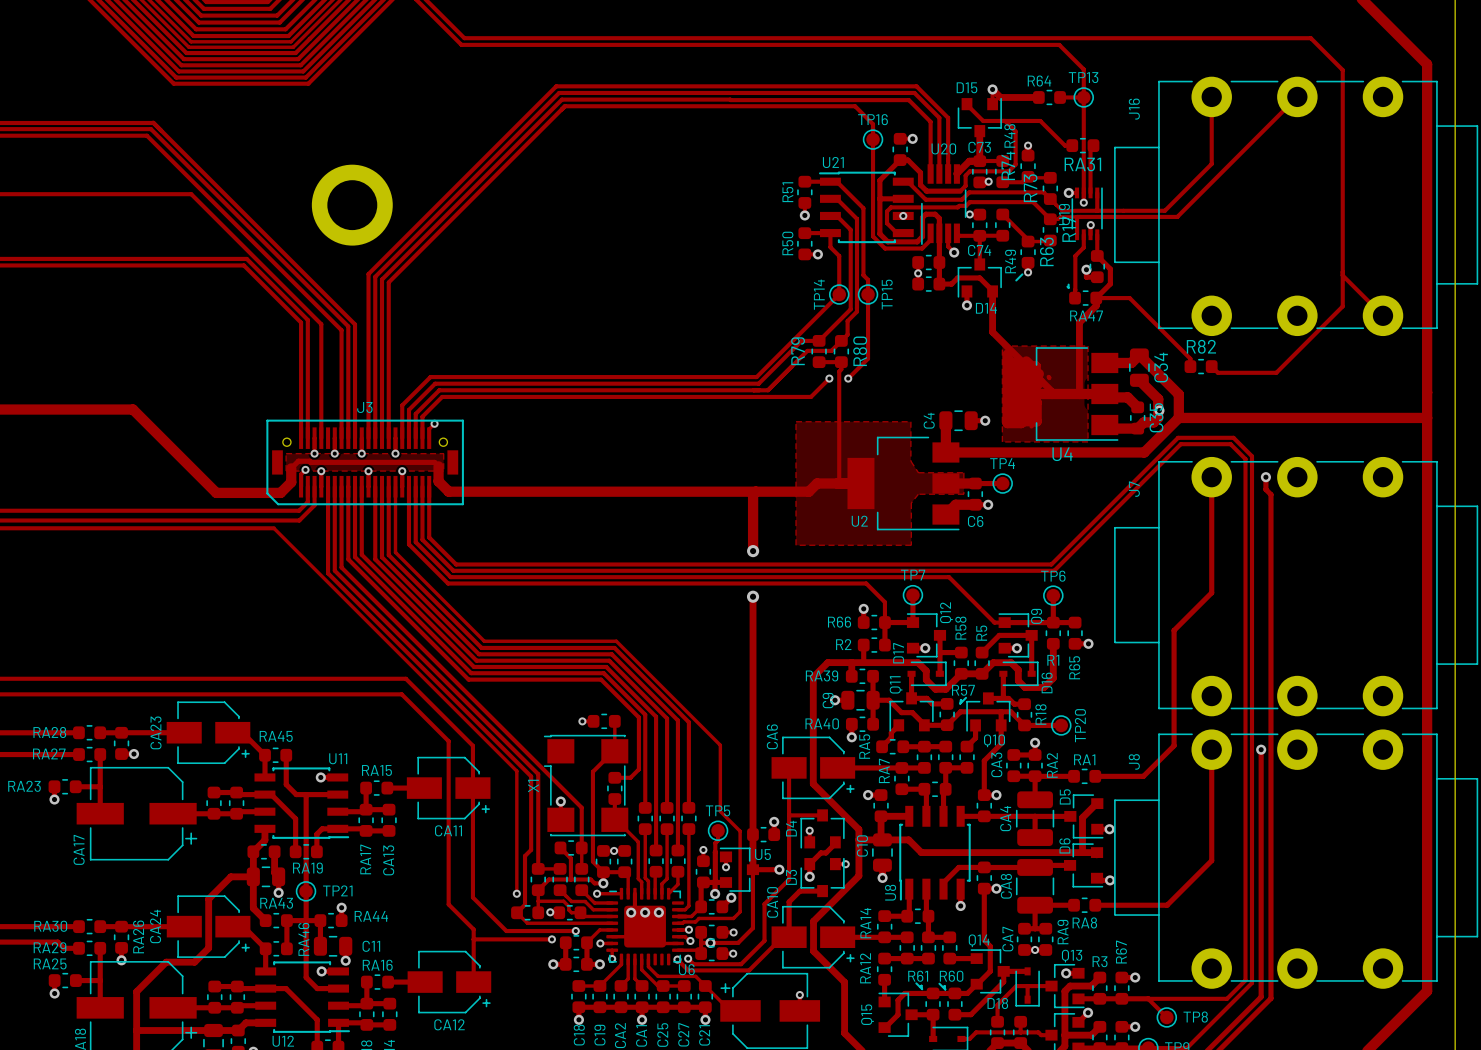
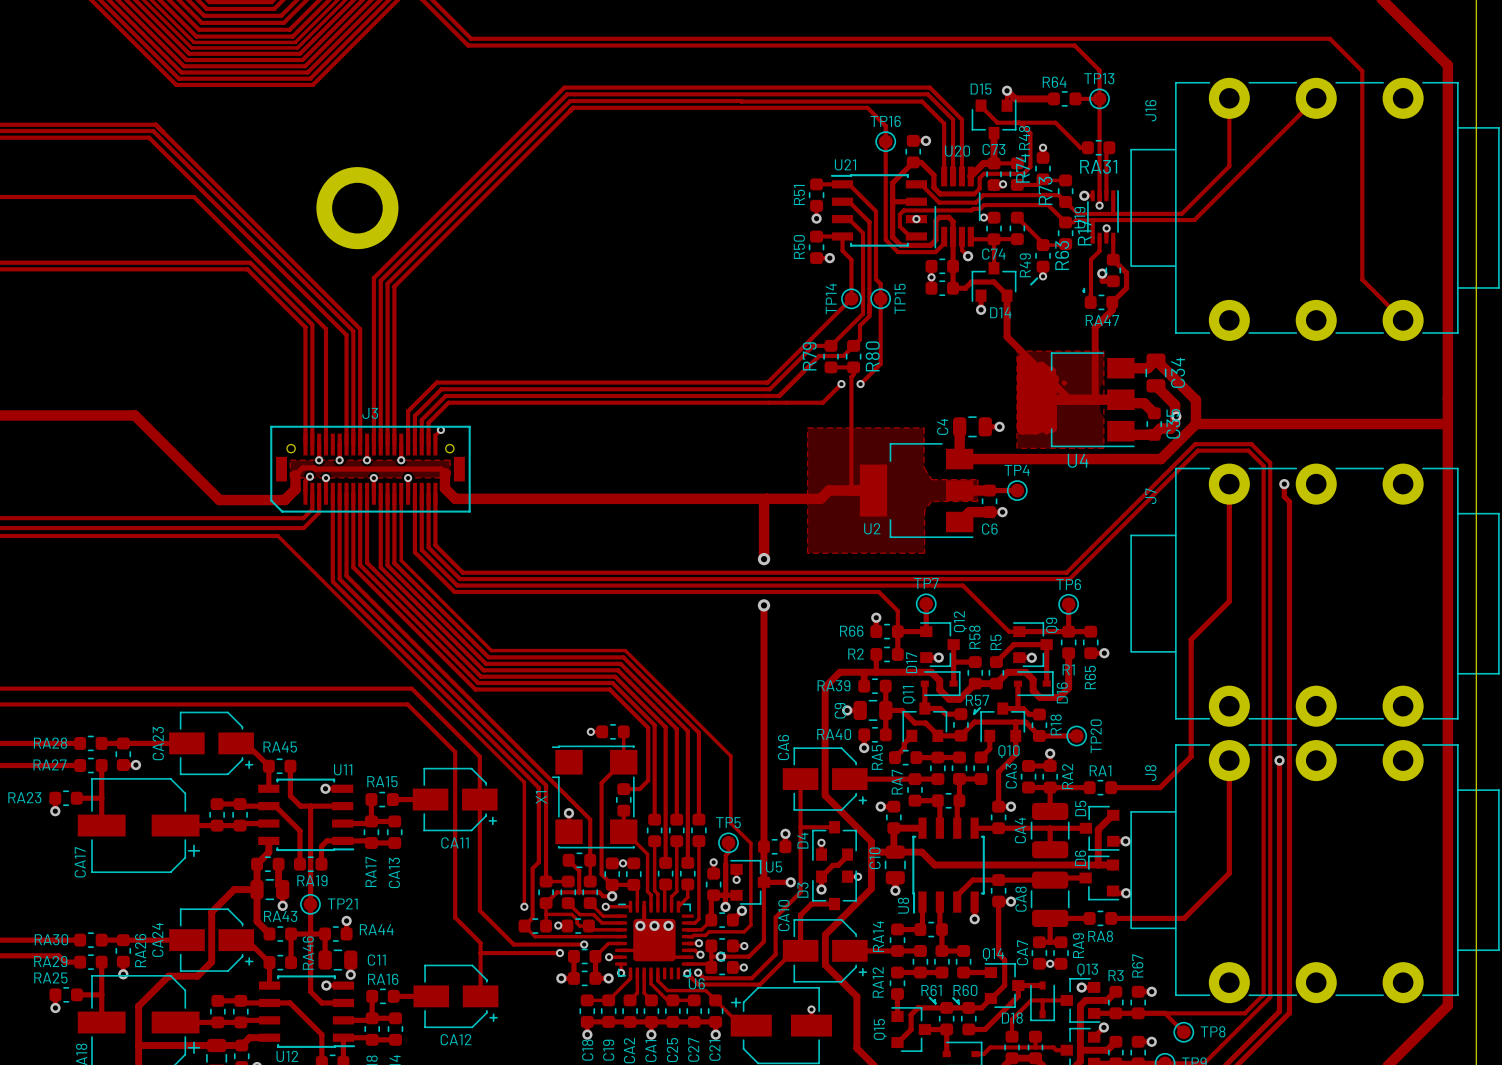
track: (1342, 275) (1342, 306) (1276, 372) (1217, 372) (1211, 366) -> none
track: (1096, 298) (1129, 298) (1190, 358) (1190, 366) -> none
R82: (1201, 366) -> none

